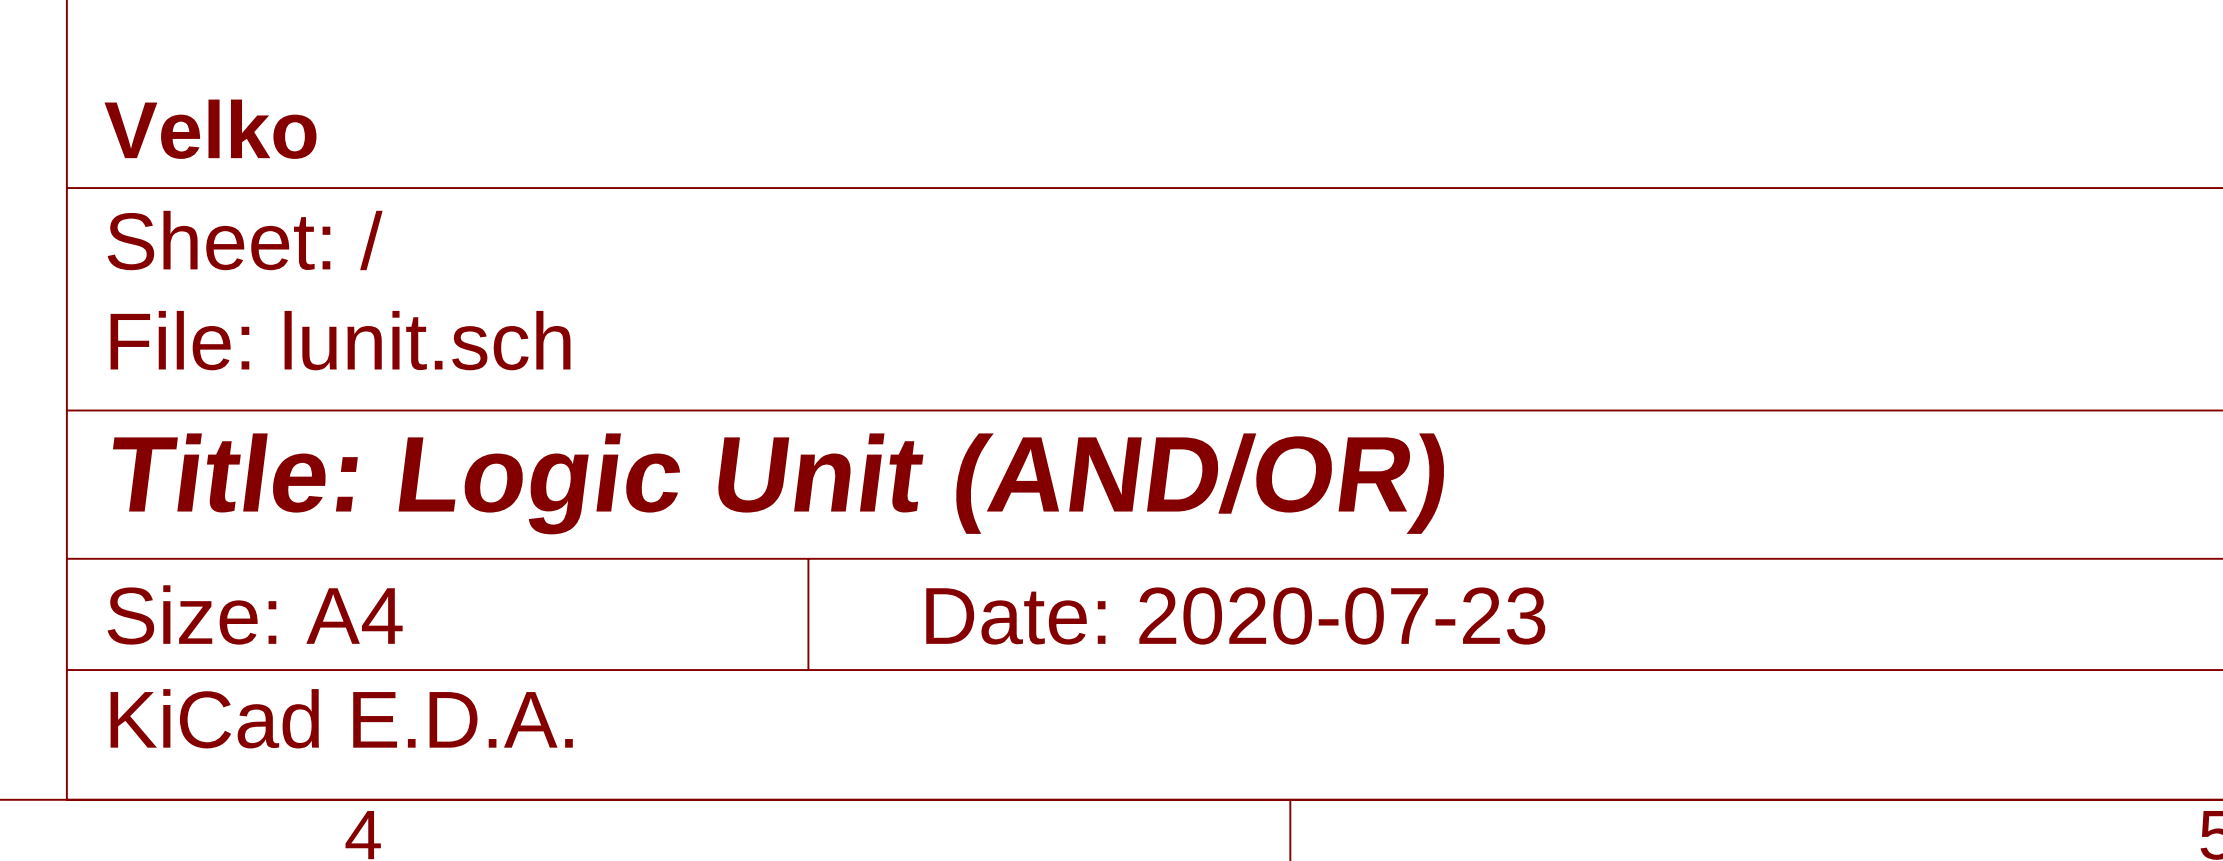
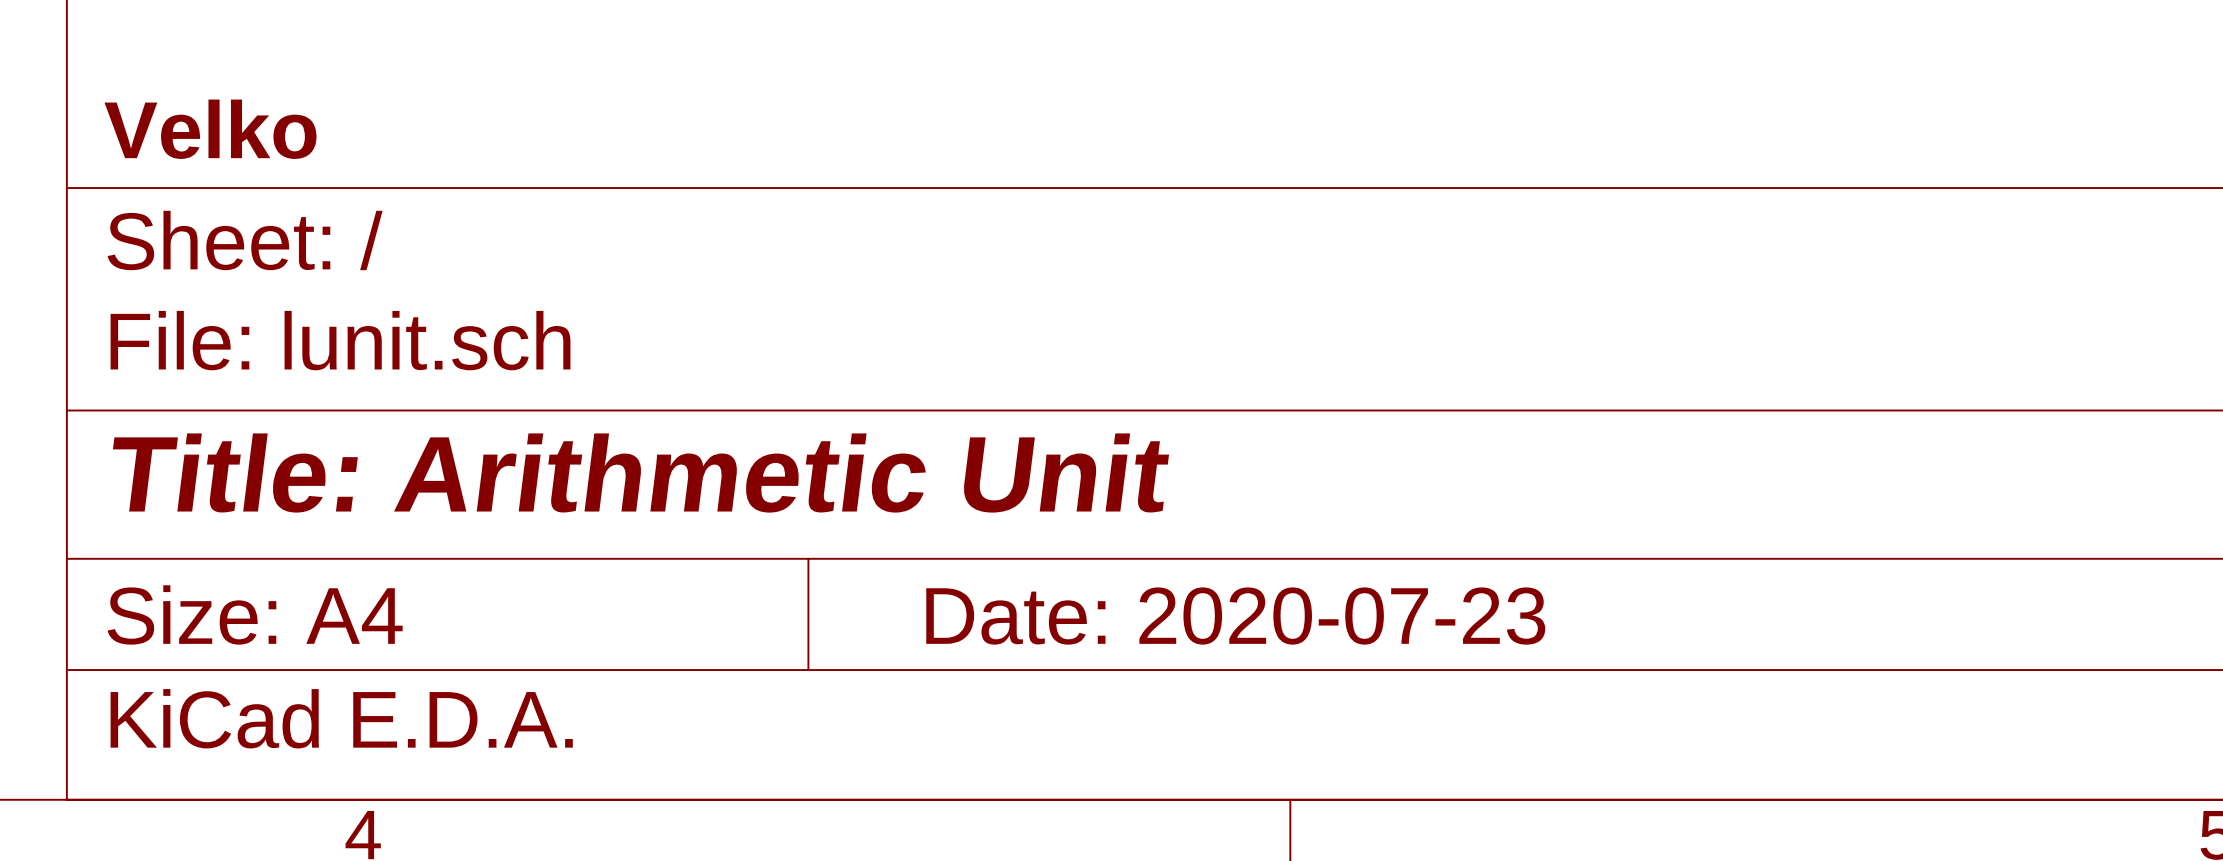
title block: Title: Logic Unit (AND/OR) (779, 483) -> Title: Arithmetic Unit (640, 473)

